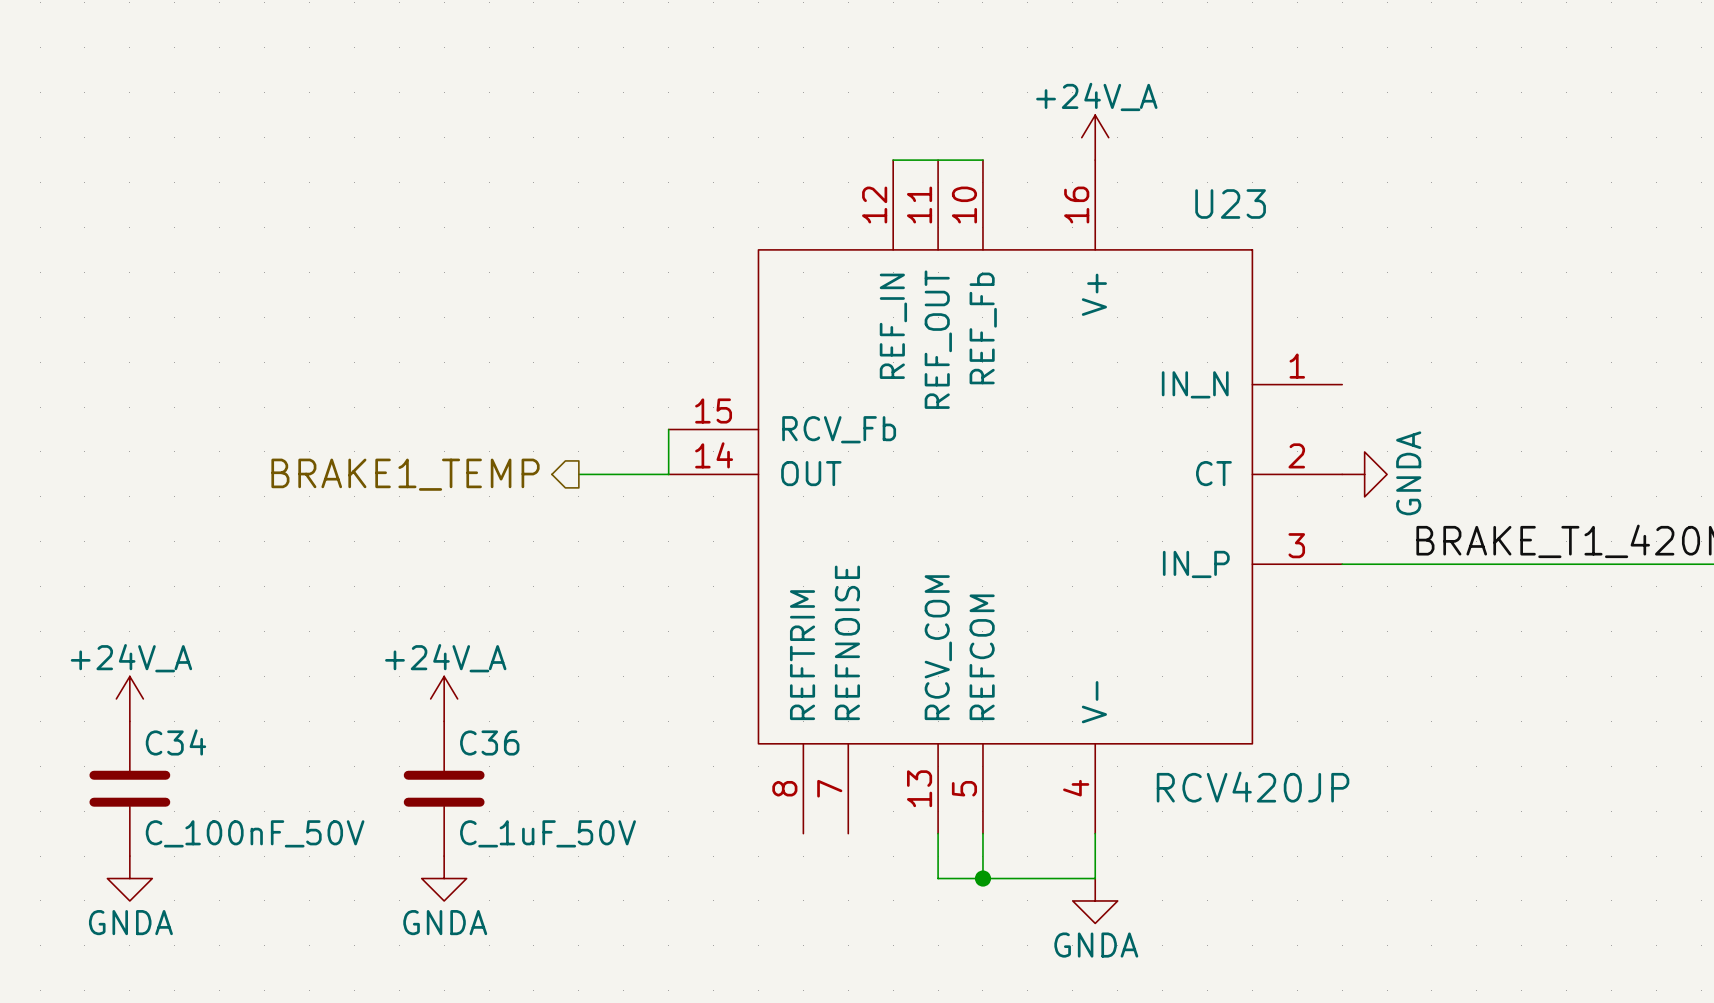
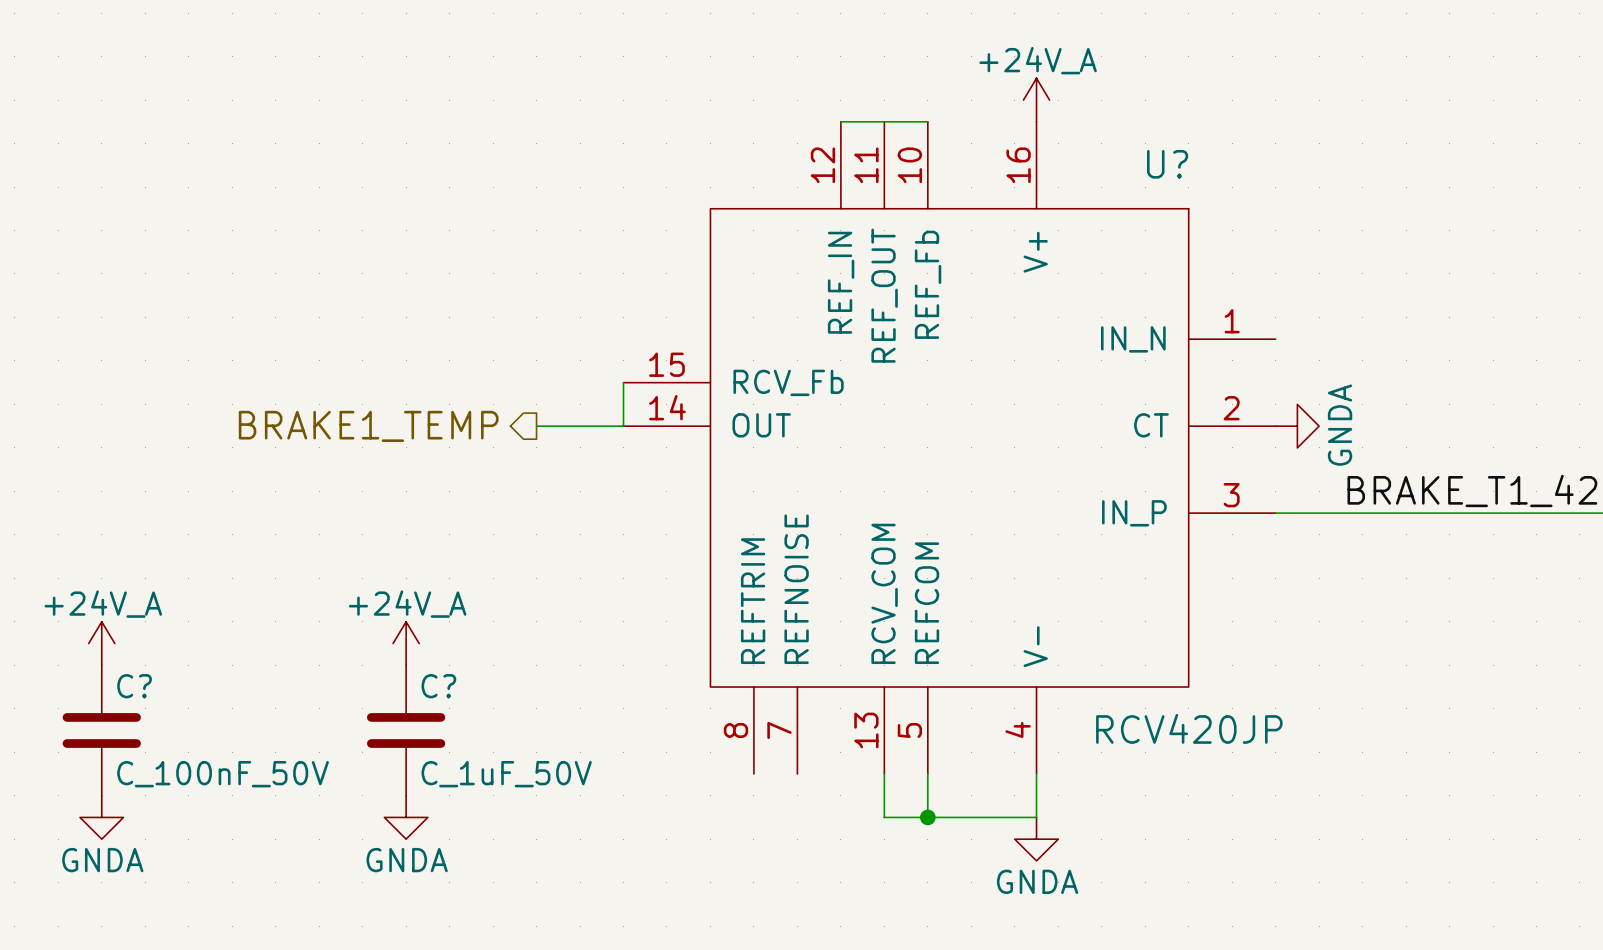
U23 name: U23 (1230, 204) -> U? (1167, 164)
C34 name: C34 (175, 742) -> C? (134, 686)
C36 name: C36 (489, 742) -> C? (438, 686)

